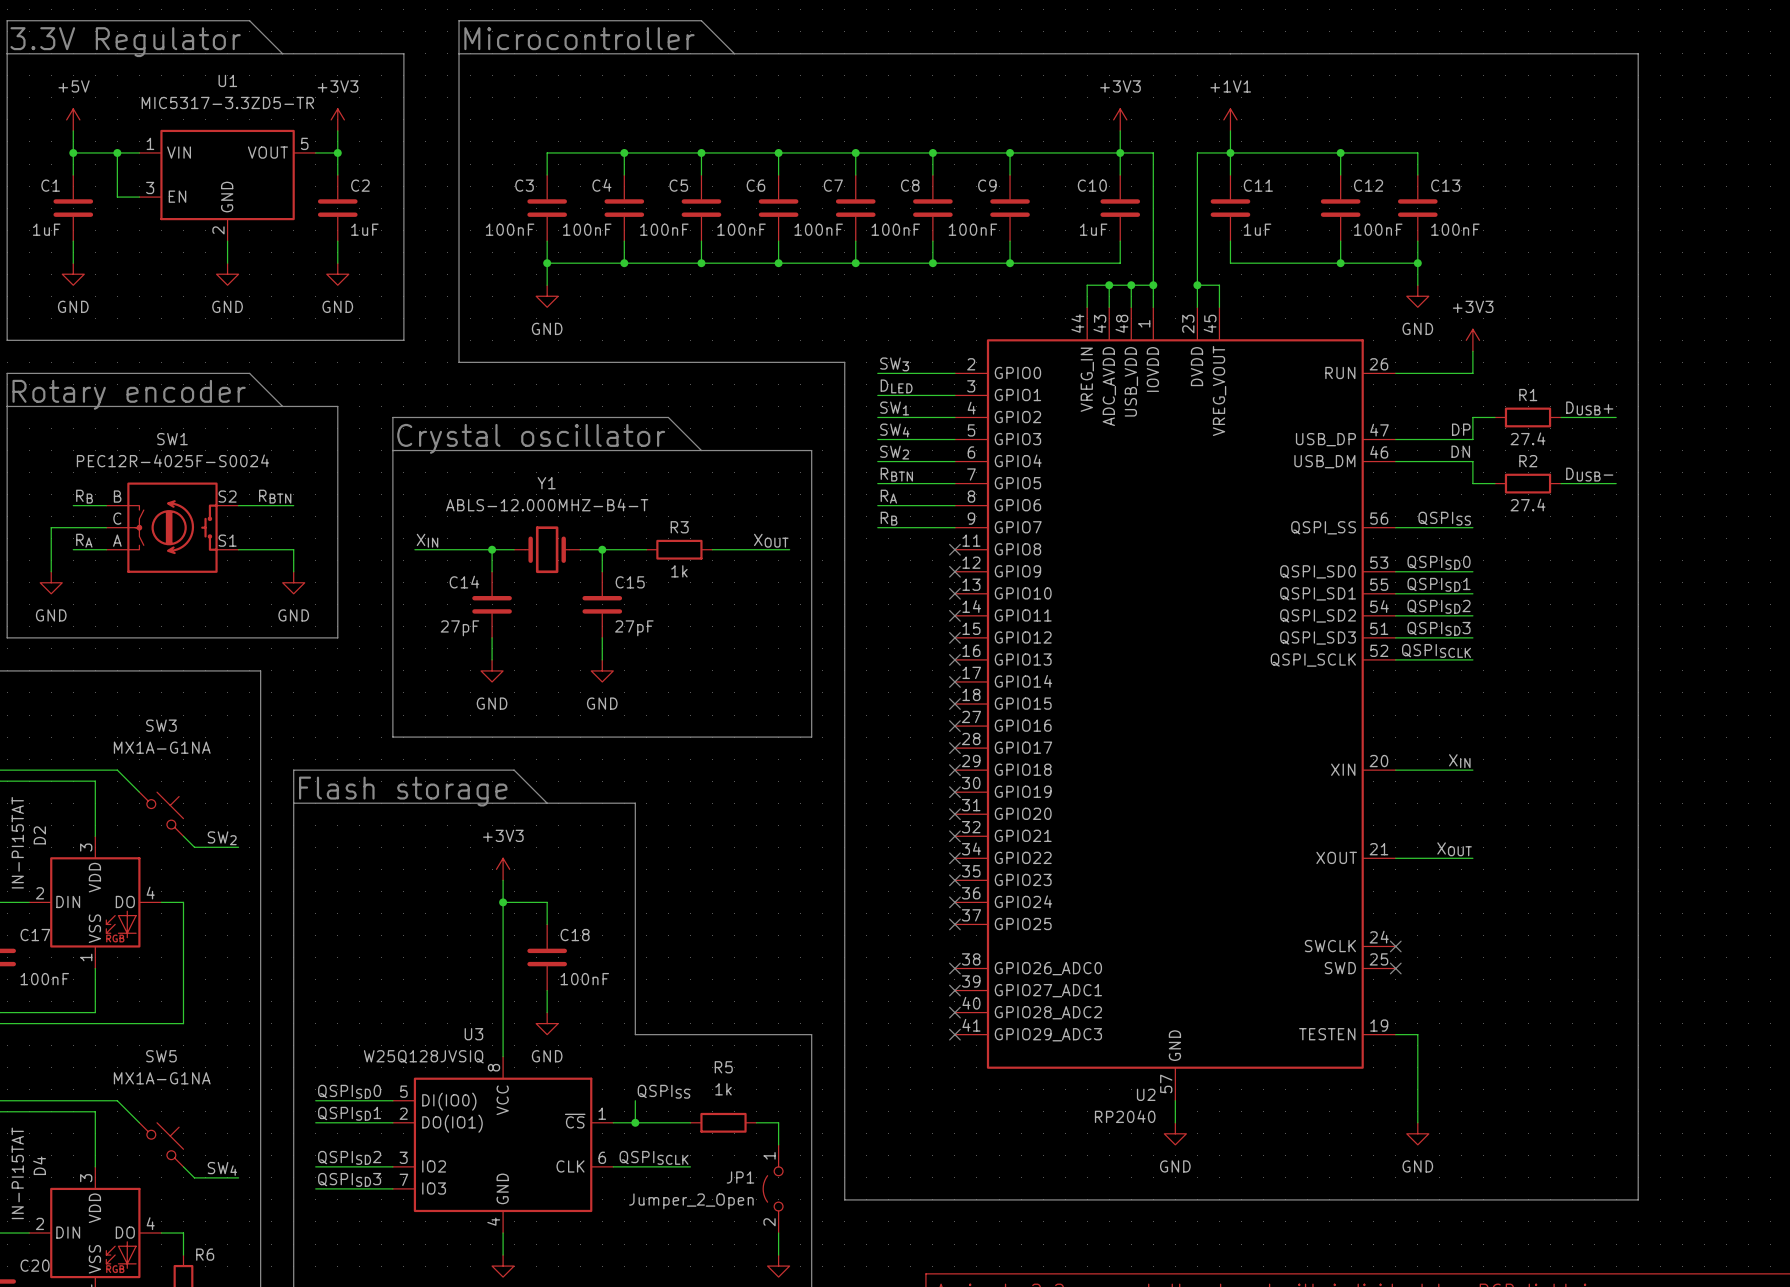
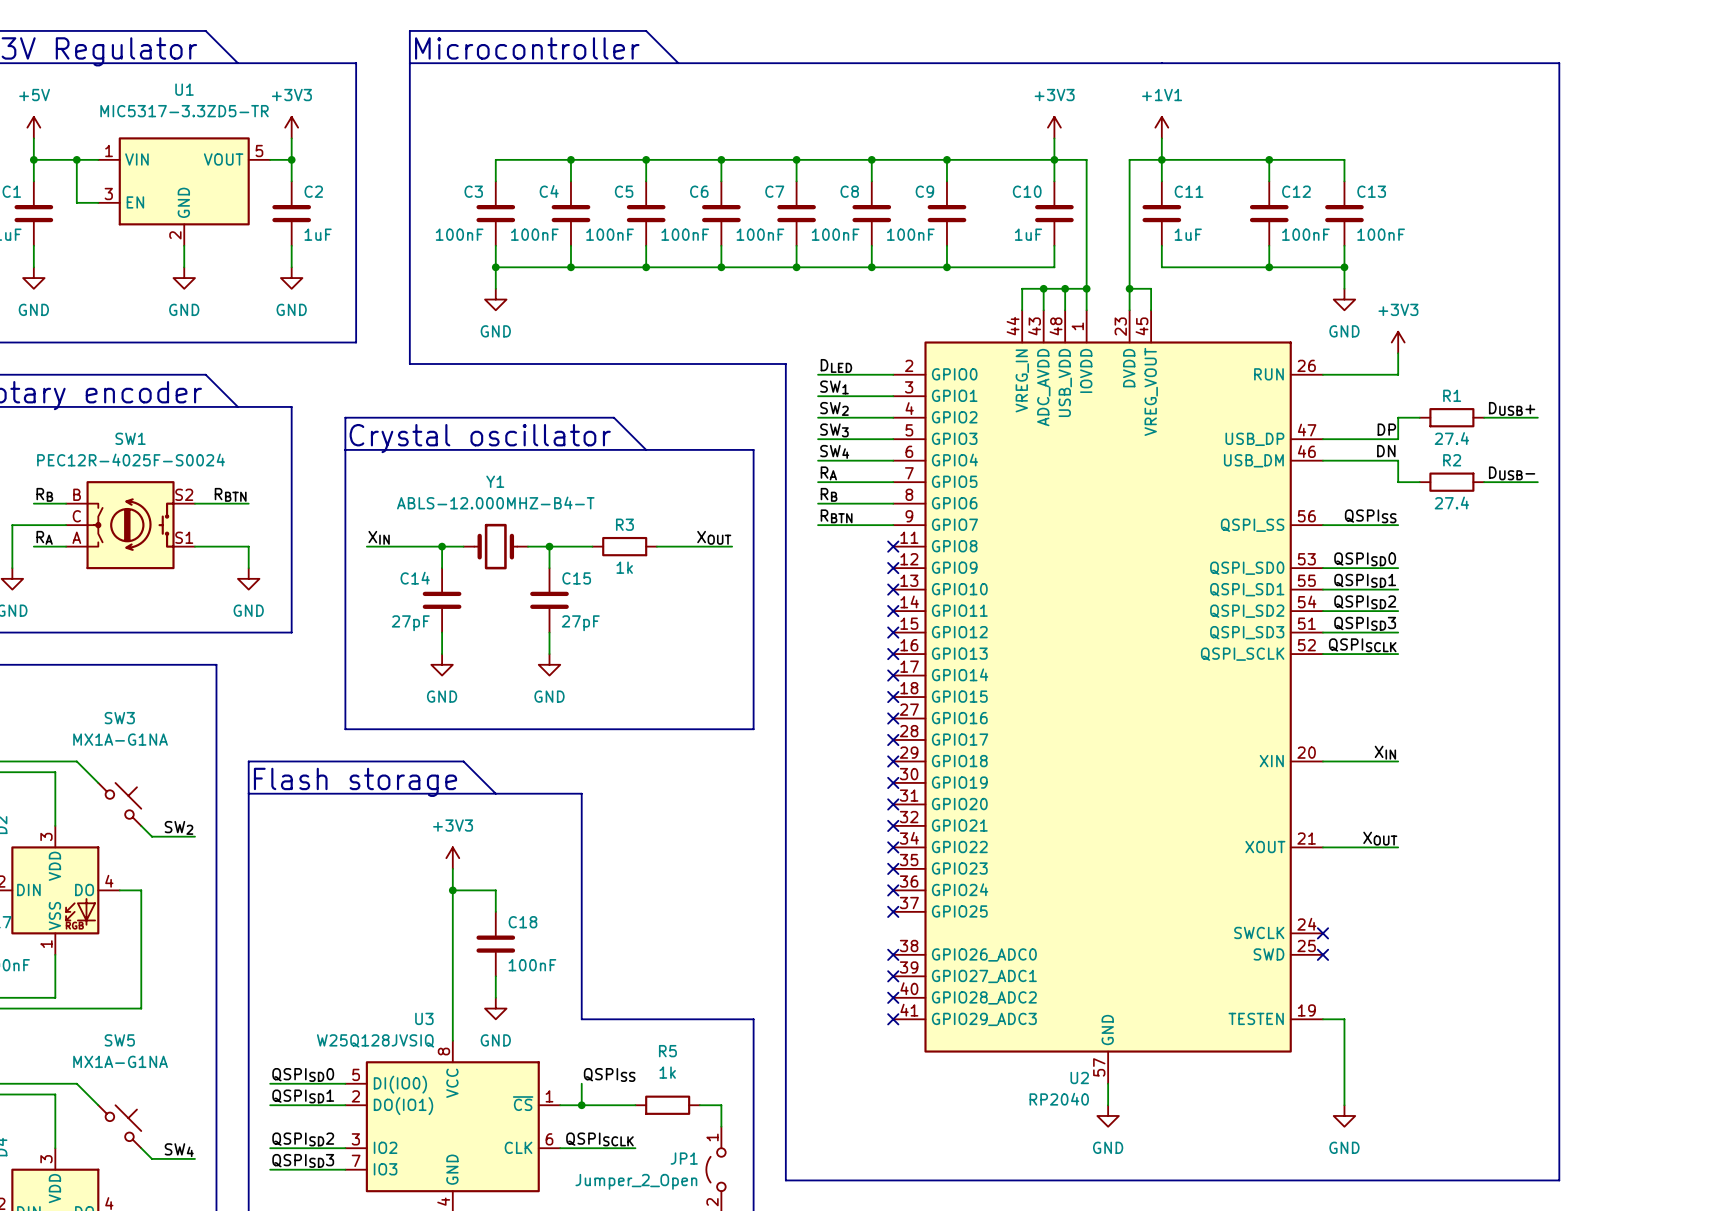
label: SW3 (894, 364) -> DLED (836, 365)
label: DLED (896, 386) -> SW1 (834, 387)
label: SW1 (894, 408) -> SW2 (834, 408)
label: SW4 (894, 430) -> SW3 (834, 430)
label: SW2 (894, 452) -> SW4 (834, 451)
label: RBTN (896, 474) -> RA (828, 473)
label: RA (888, 496) -> RB (829, 494)
label: RB (889, 518) -> RBTN (836, 516)

